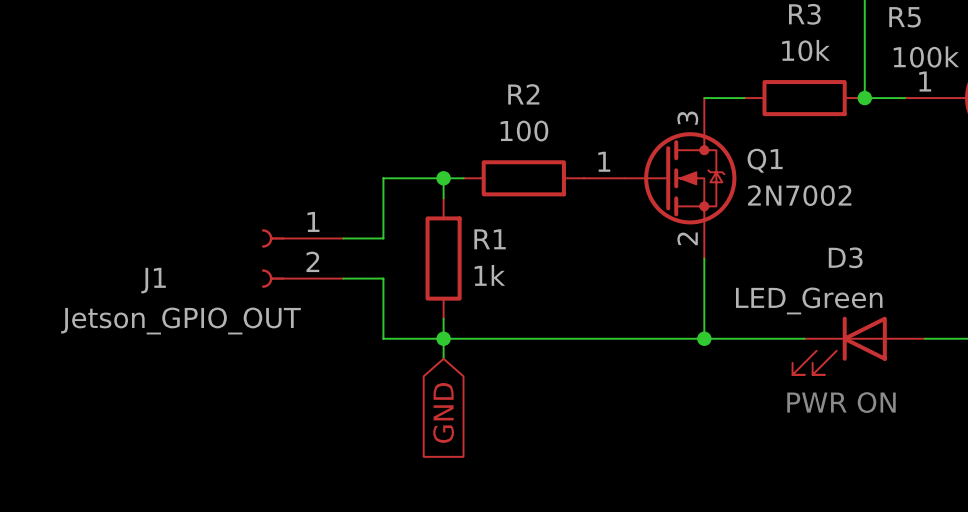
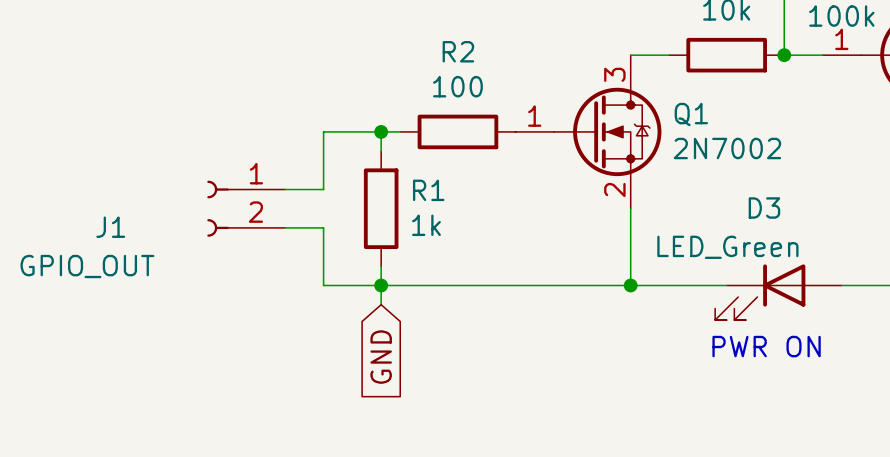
J1 value: Jetson_GPIO_OUT (180, 321) -> GPIO_OUT (87, 266)

